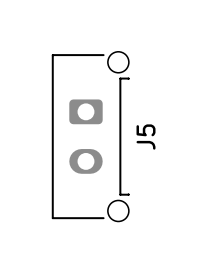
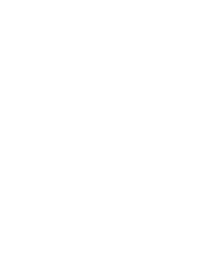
J5: (90, 136) -> none

